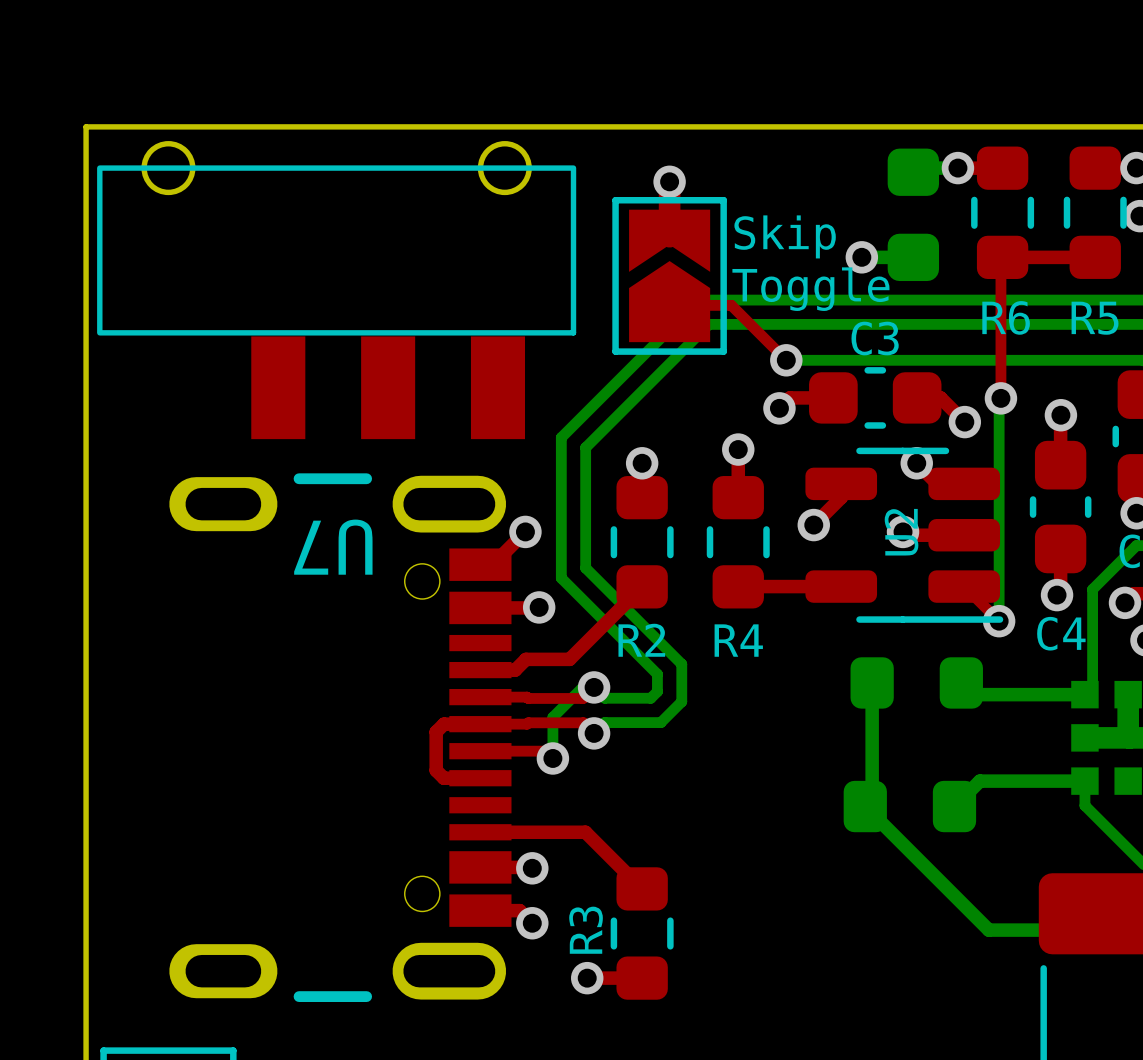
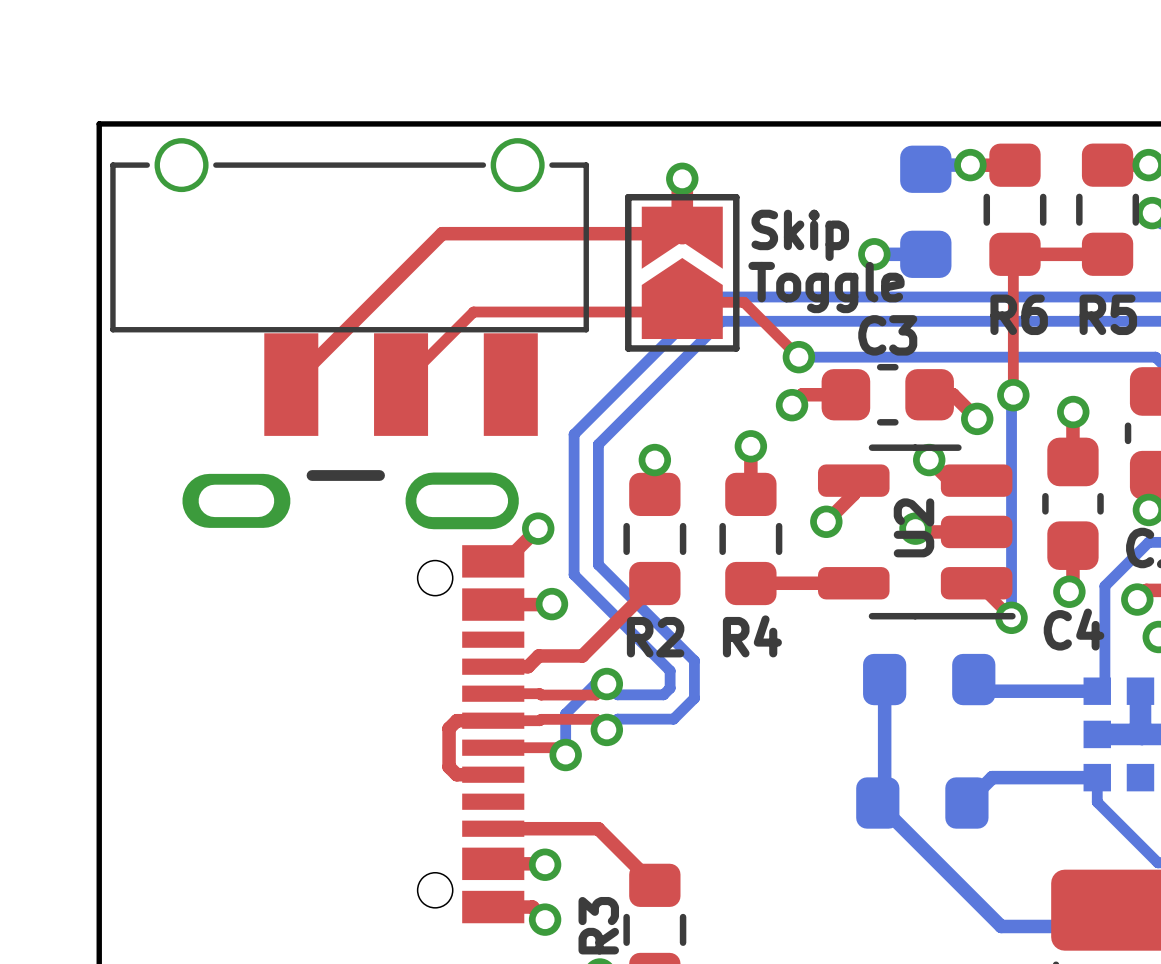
top track: none -> (682, 233) (442, 233) (291, 384)
U7: (336, 290) -> none
part: none -> (349, 287)
top track: none -> (682, 312) (473, 312) (401, 384)

